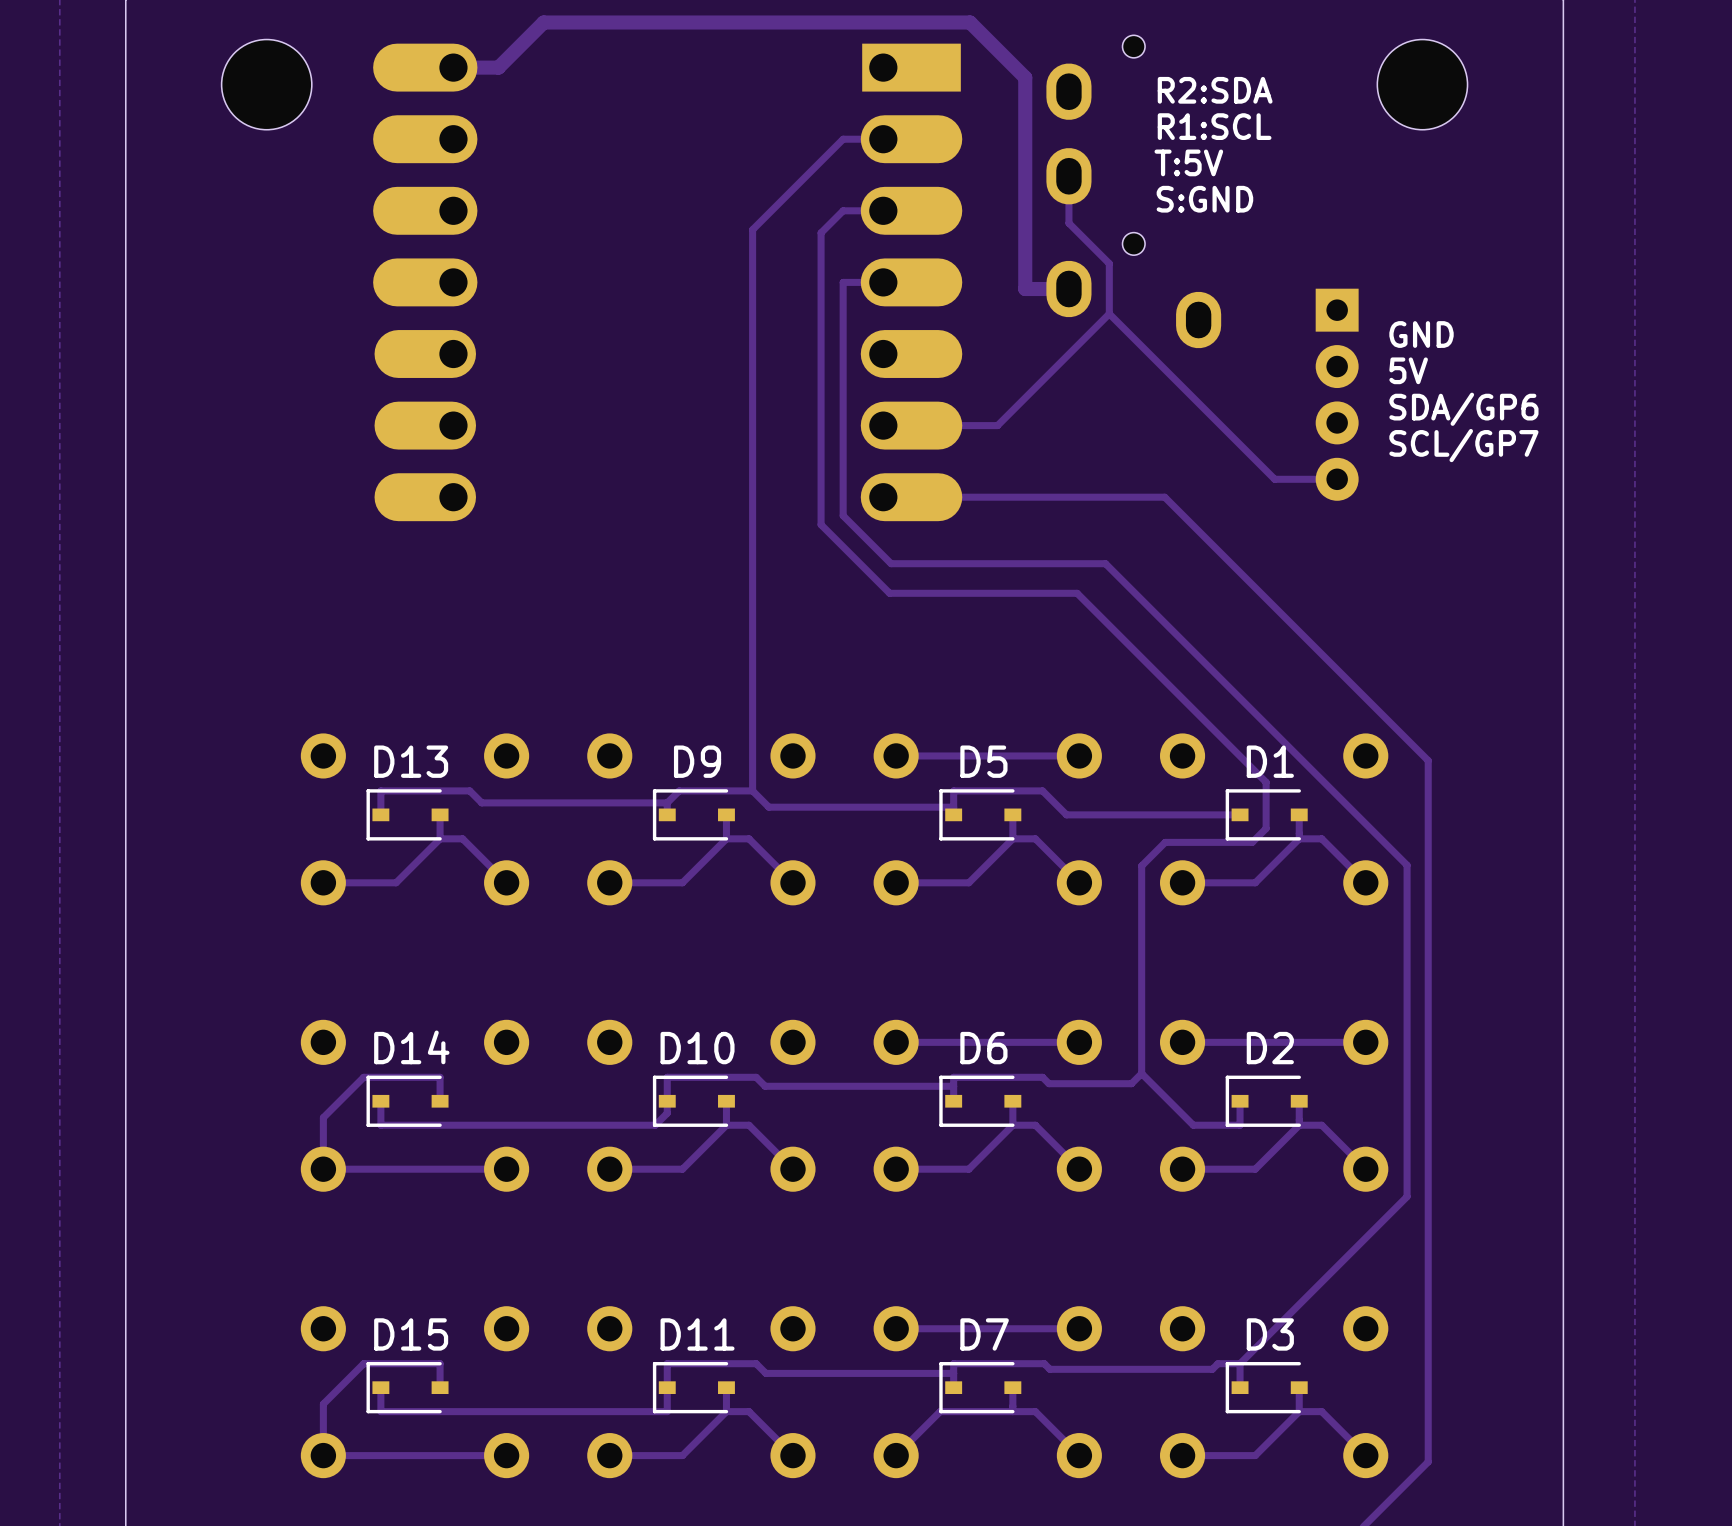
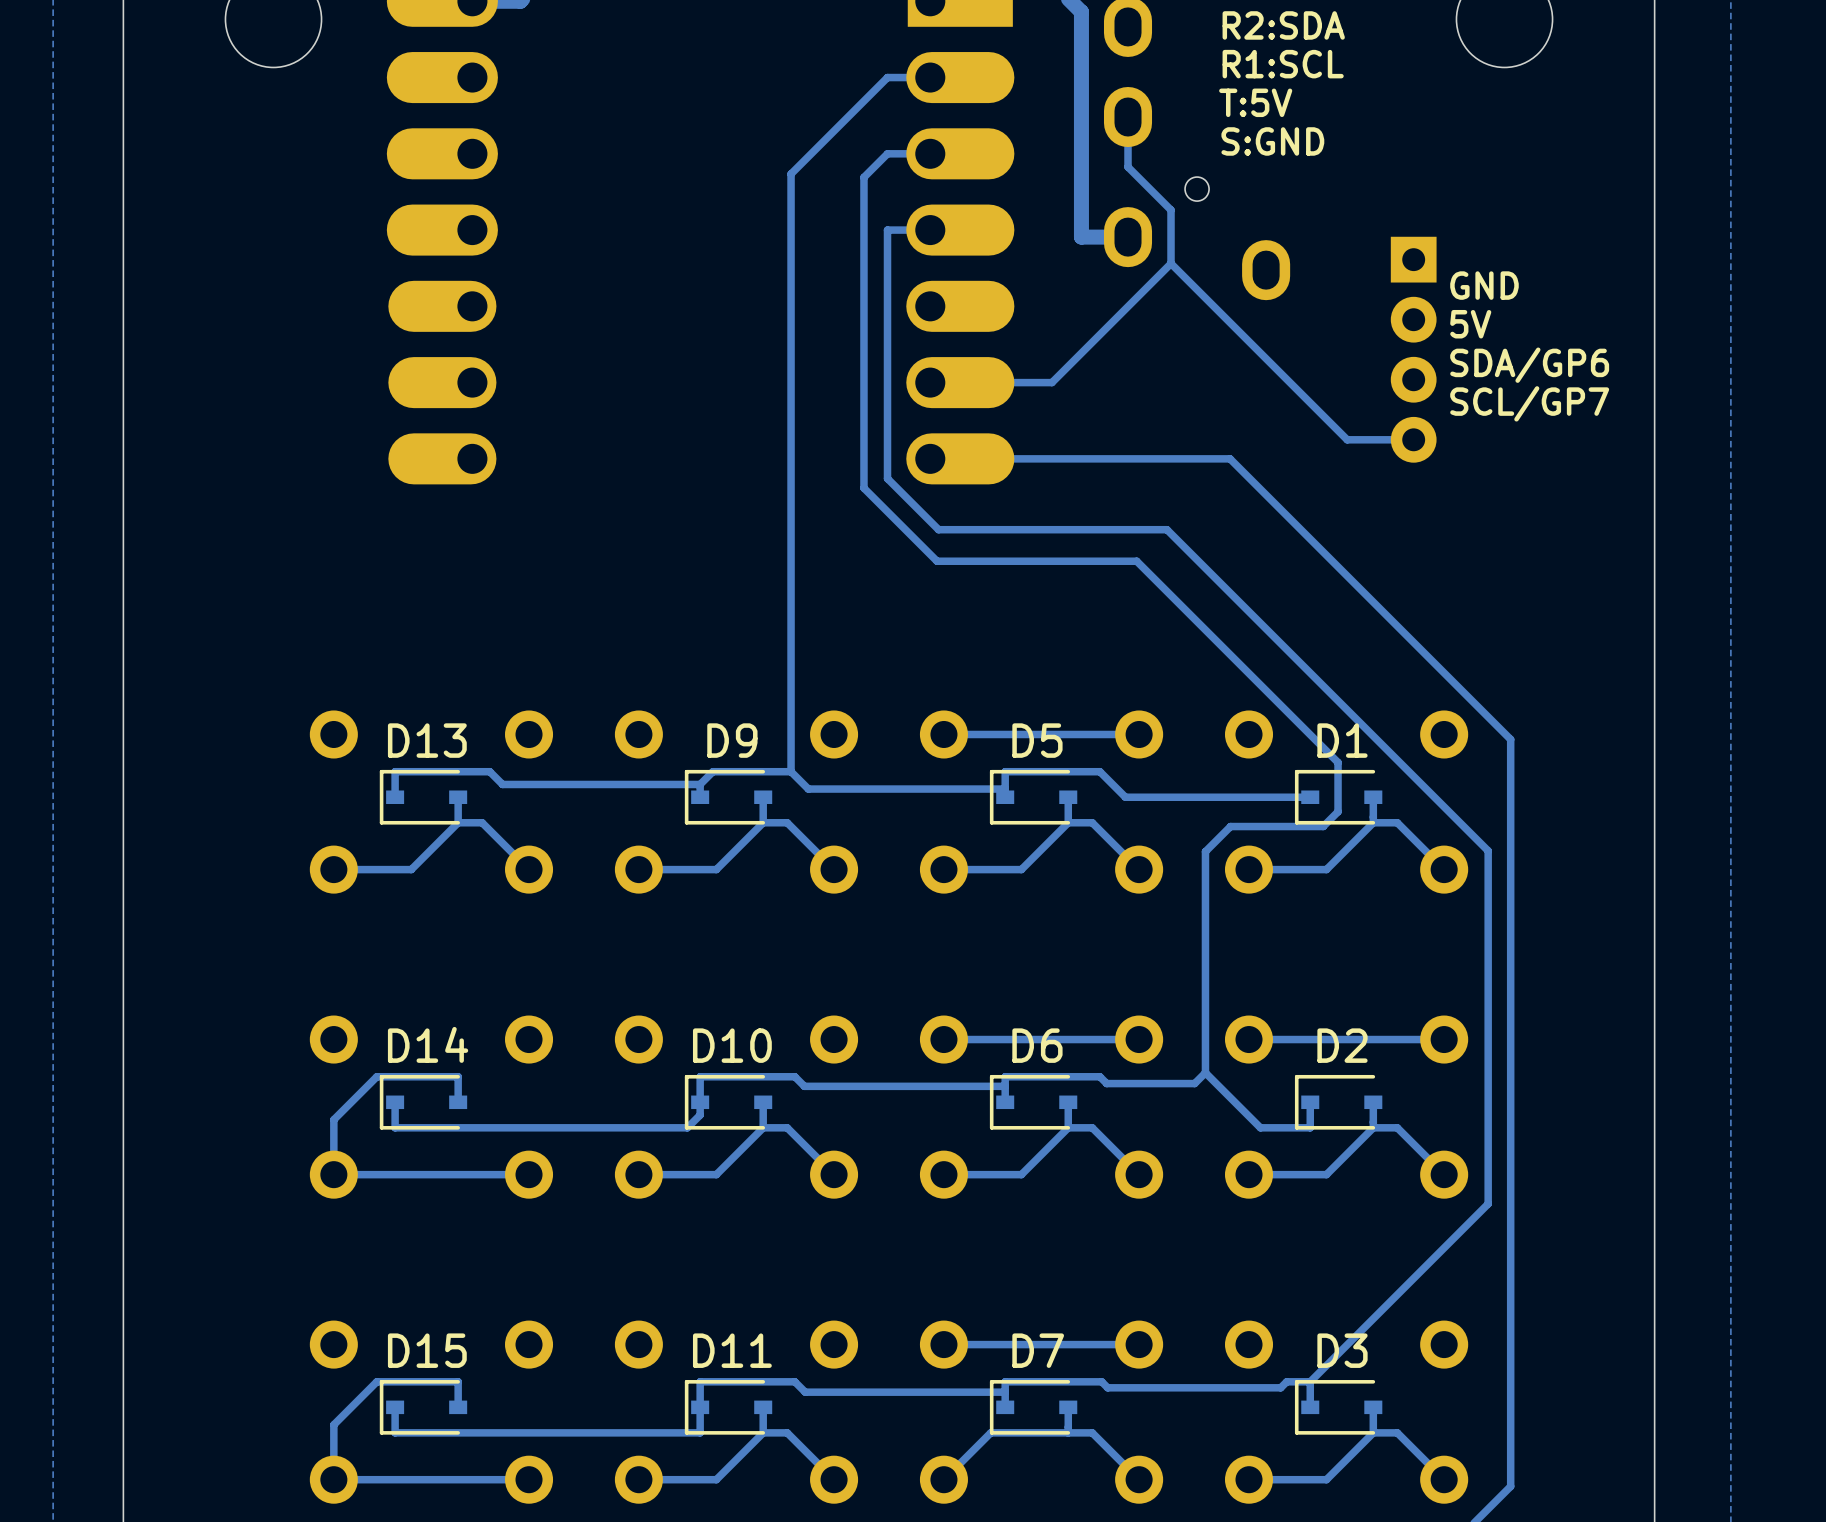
text position: GND (1421, 334) -> GND (1484, 285)
text position: 5V (1408, 370) -> 5V (1470, 324)
text position: SDA/GP6 (1463, 409) -> SDA/GP6 (1529, 365)
text position: SCL/GP7 (1463, 445) -> SCL/GP7 (1529, 403)

